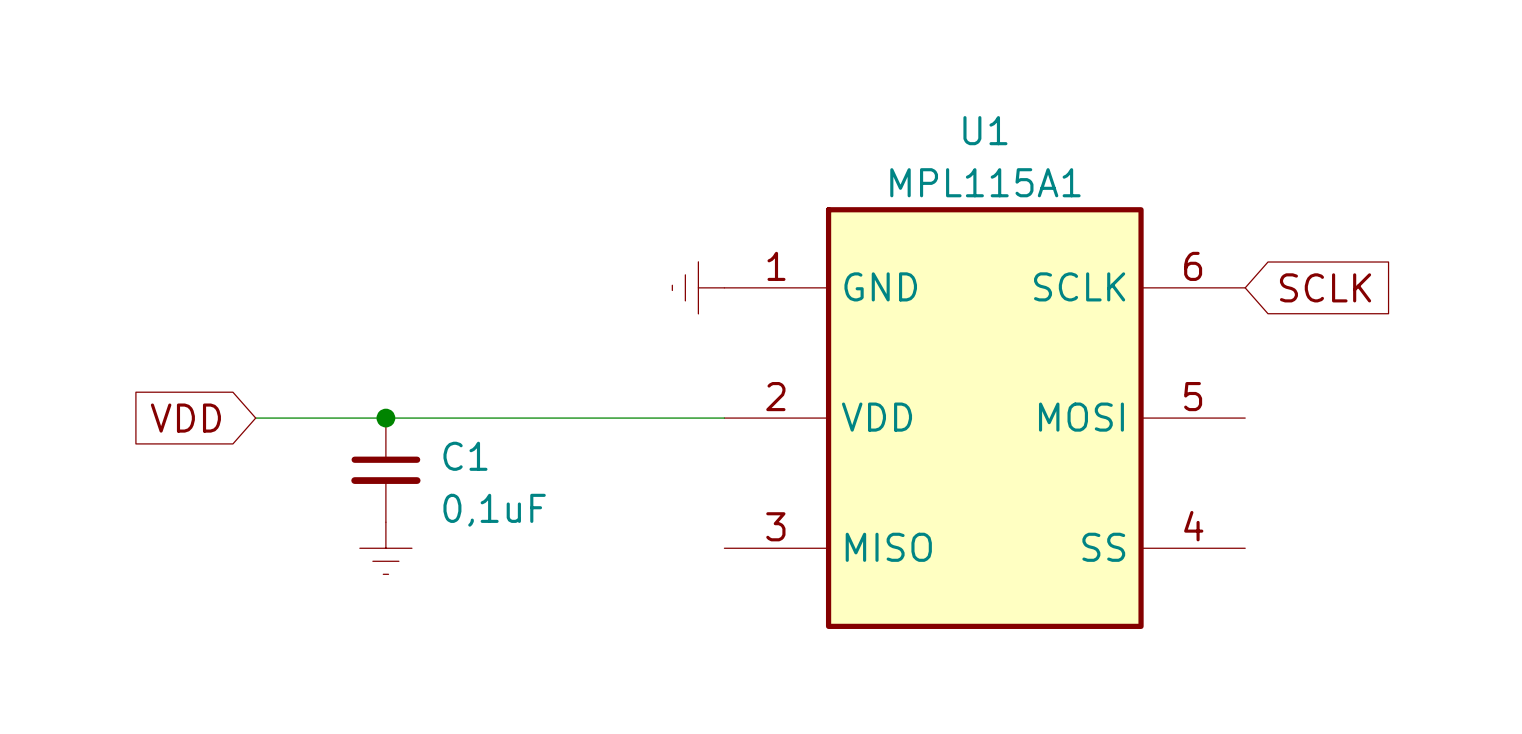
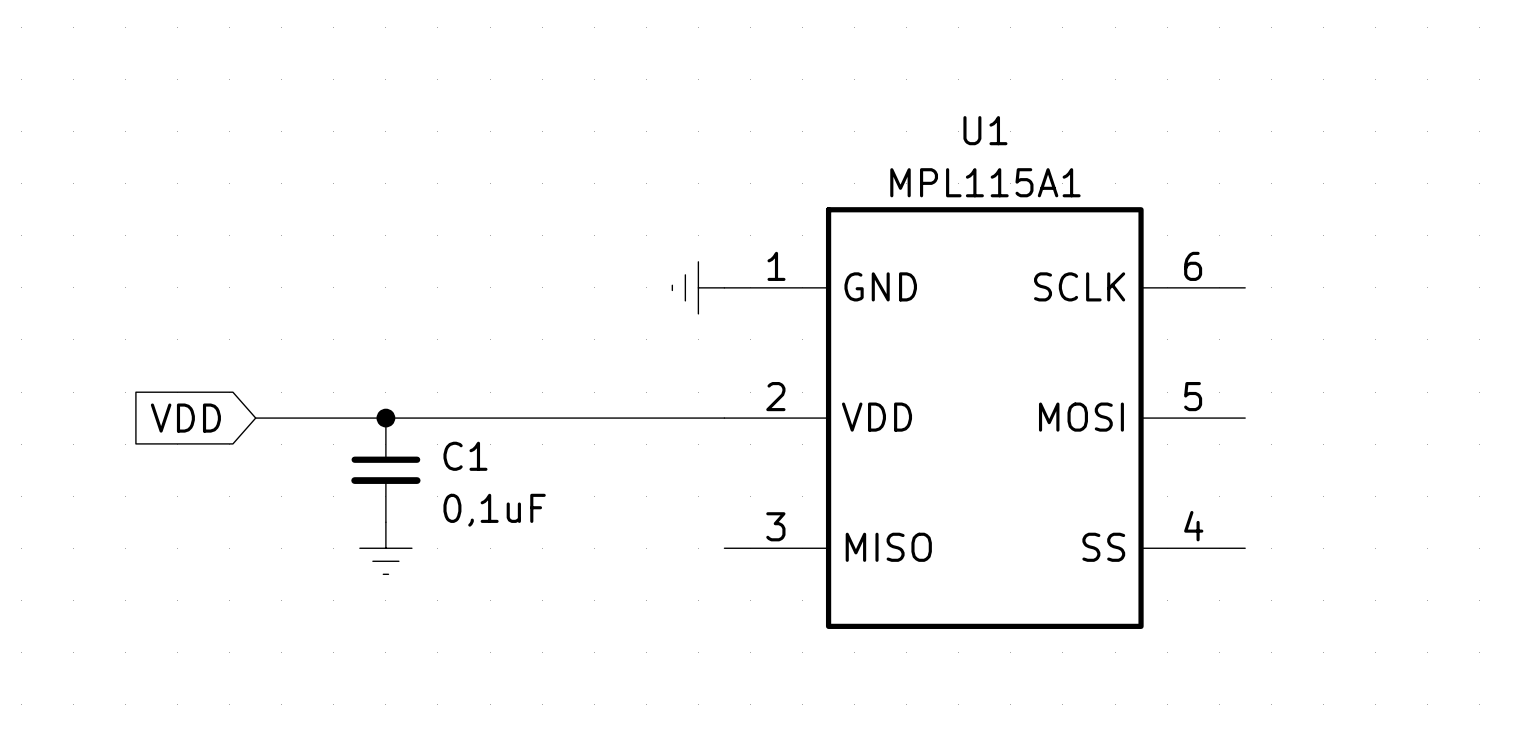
global label: SCLK (1325, 287) -> none

